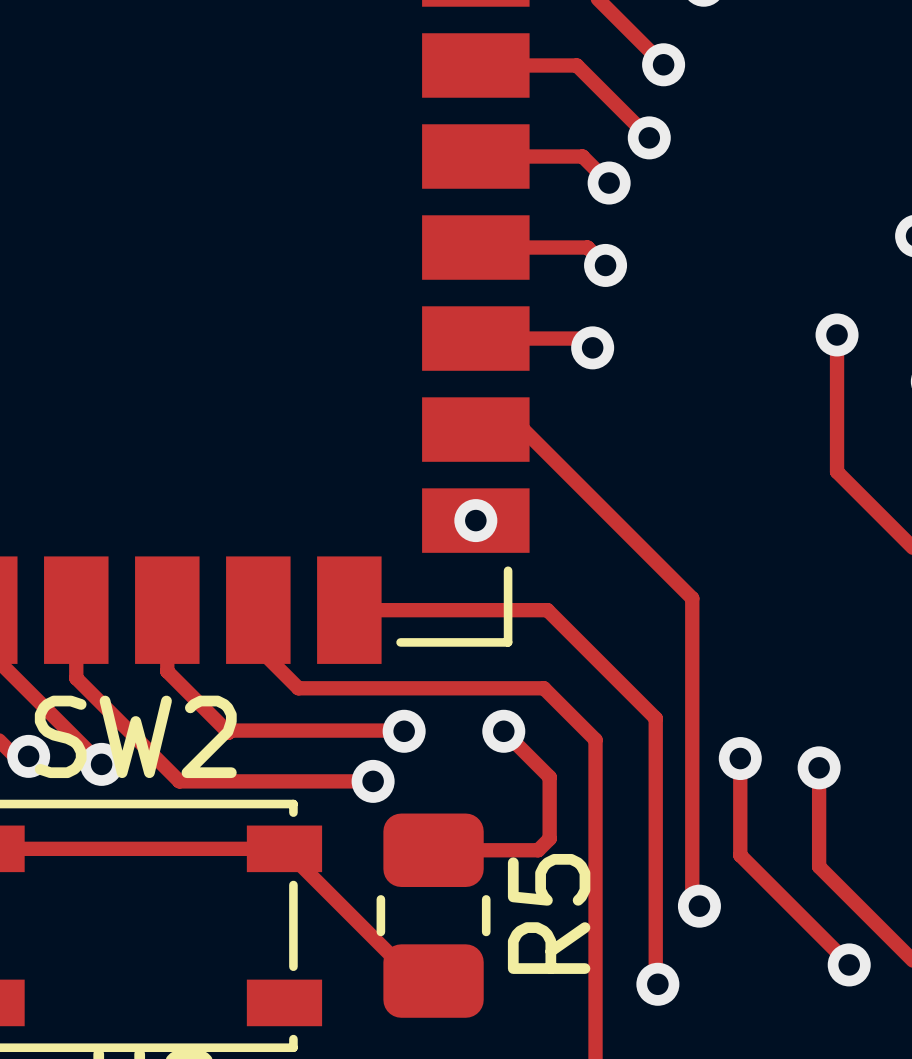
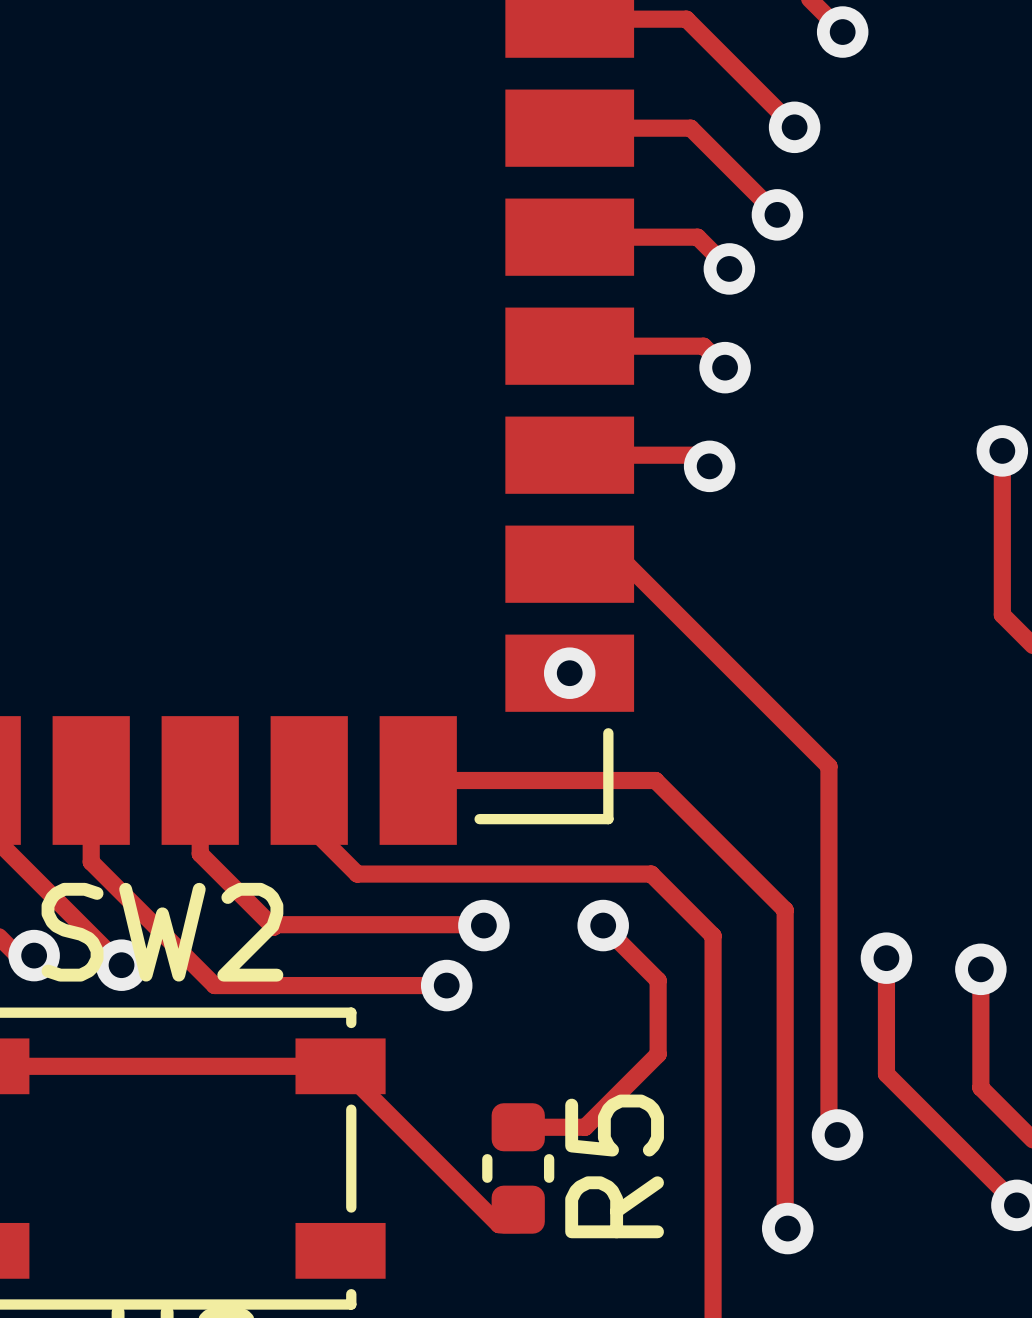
R5 footprint: [376, 813, 491, 1018] -> [482, 1103, 555, 1234]
track: (433, 850) (538, 850) -> (519, 1127) (585, 1127) (644, 1068)
R5 name position: R5 (549, 913) -> R5 (614, 1166)

